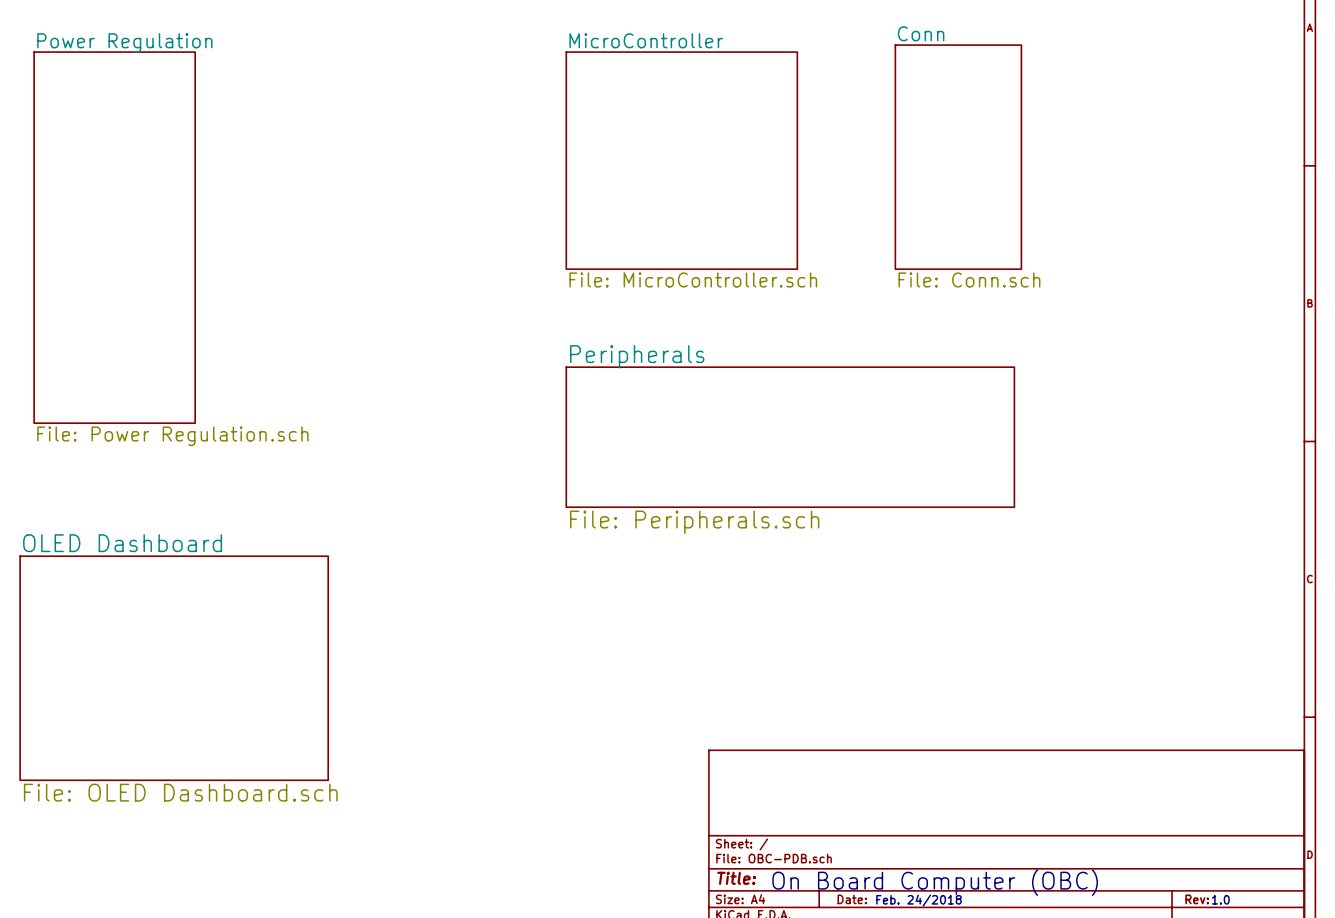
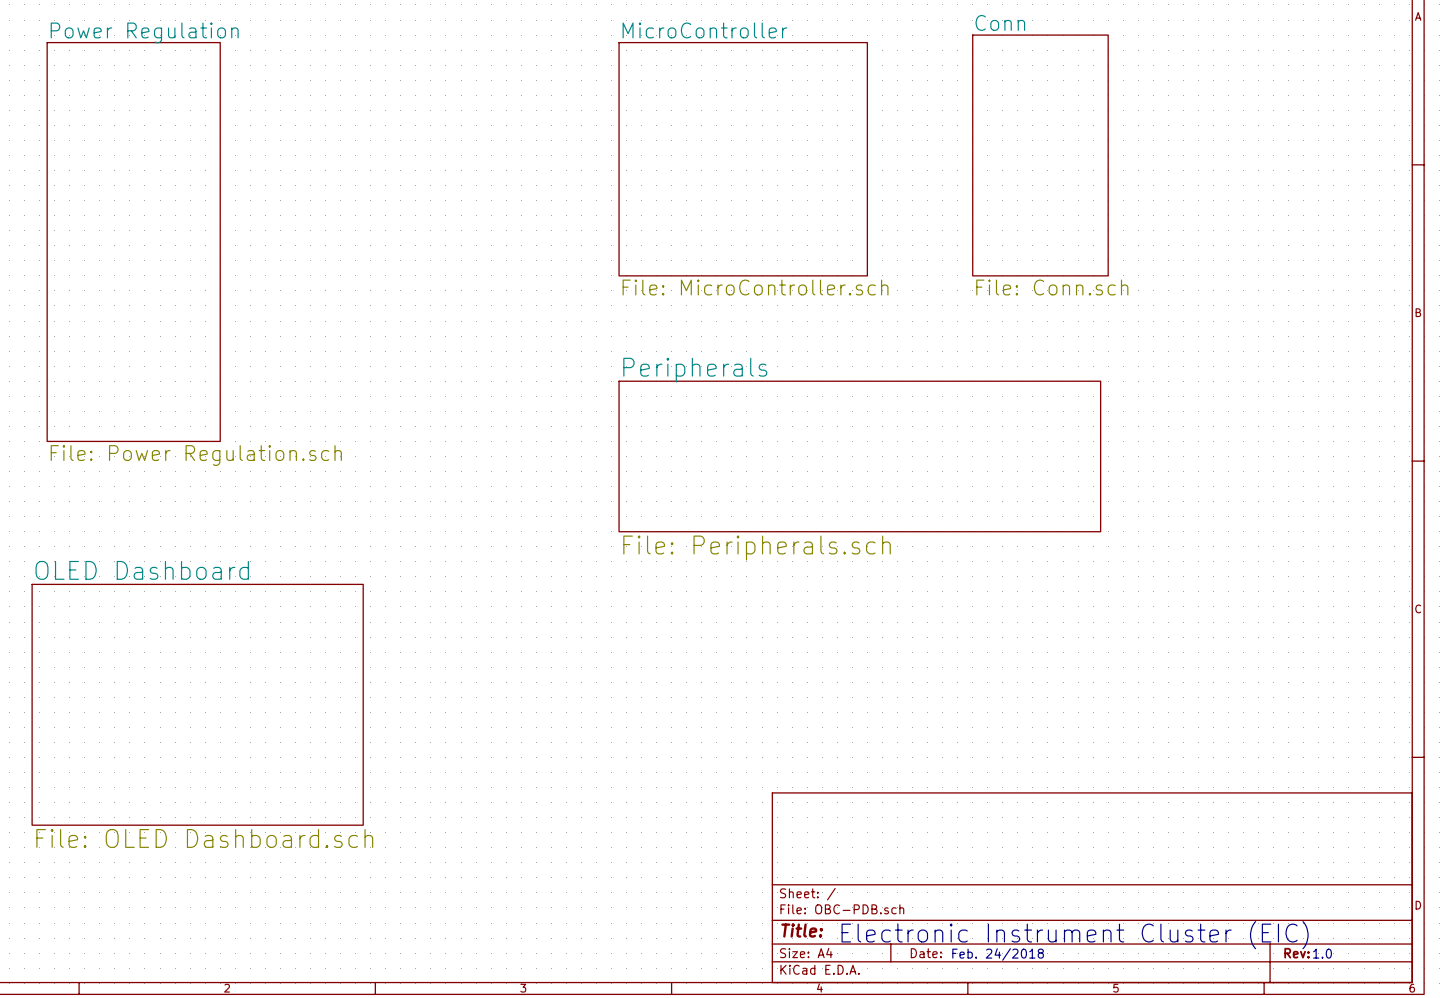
text: On Board Computer (OBC) (935, 882) -> Electronic Instrument Cluster (EIC) (1075, 935)

